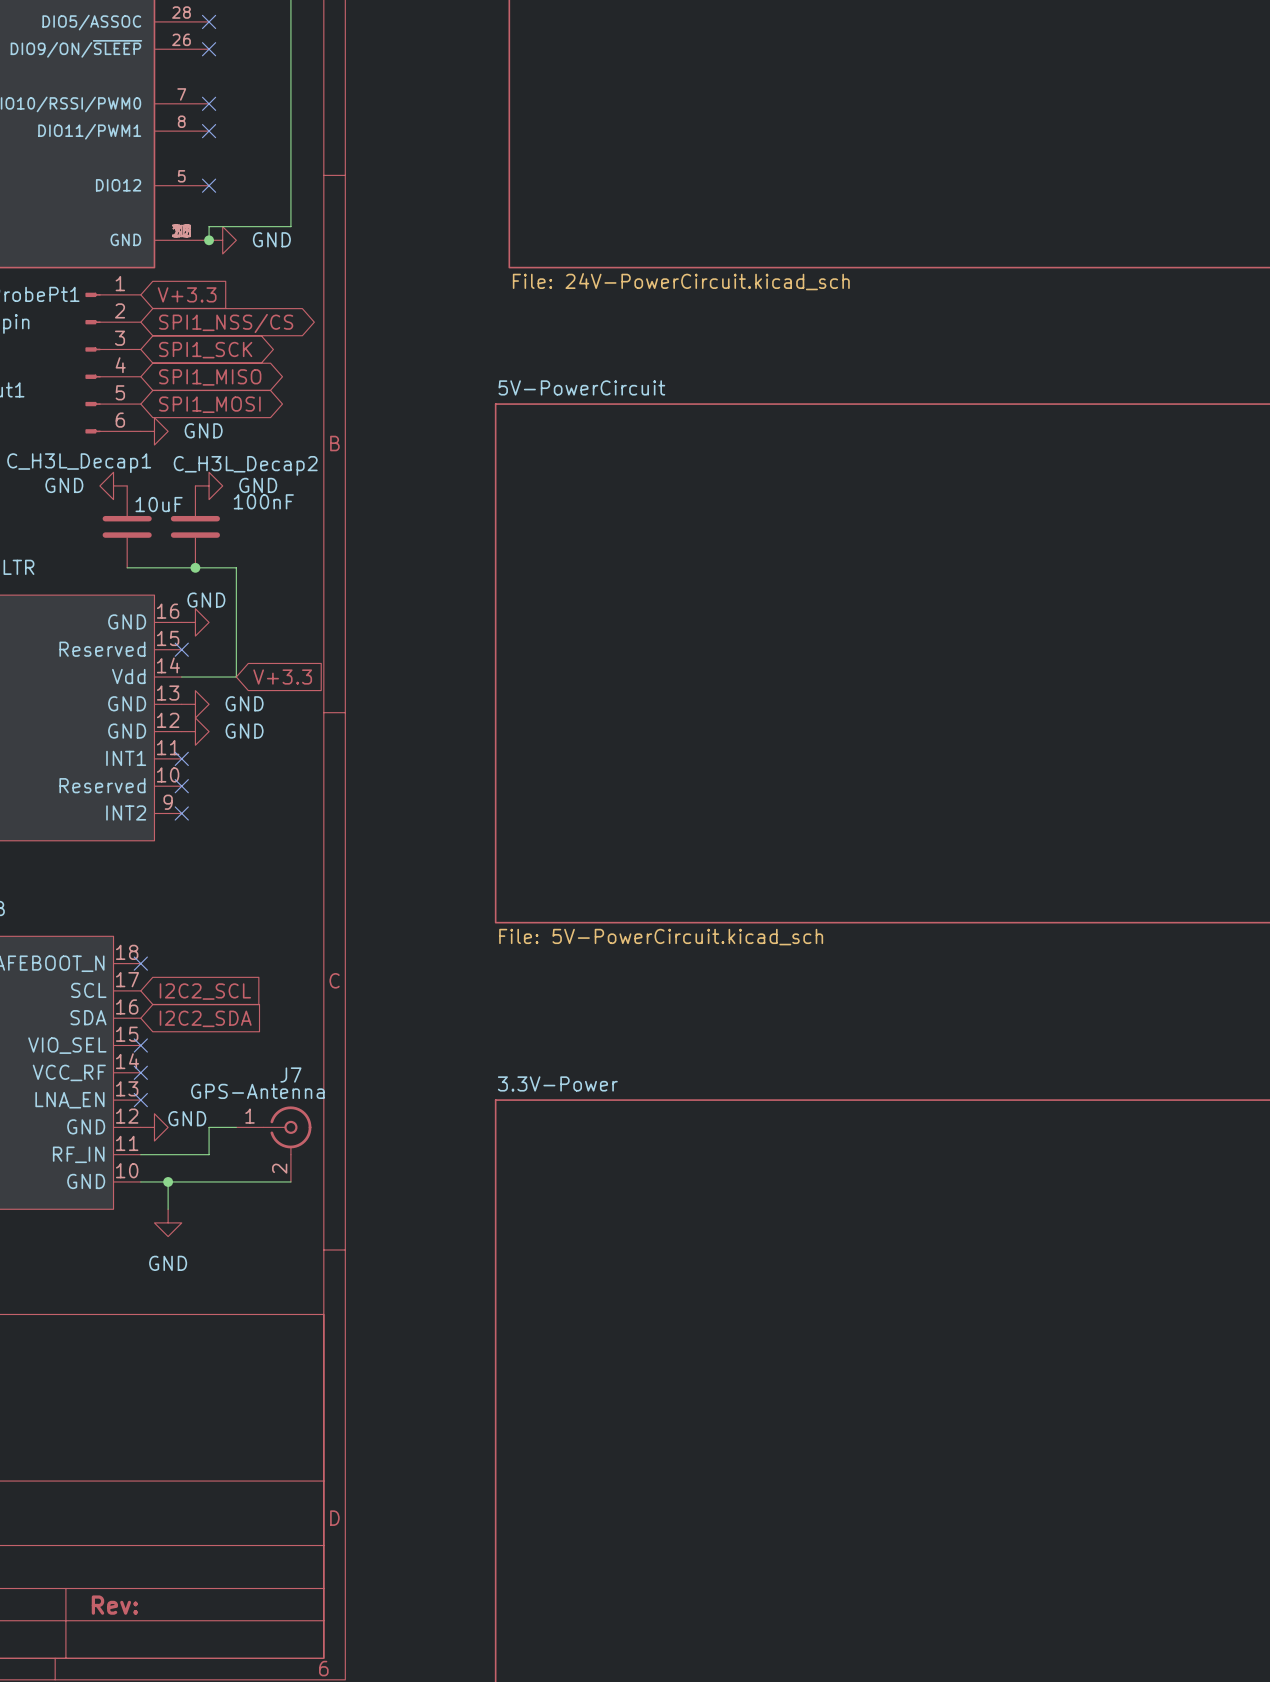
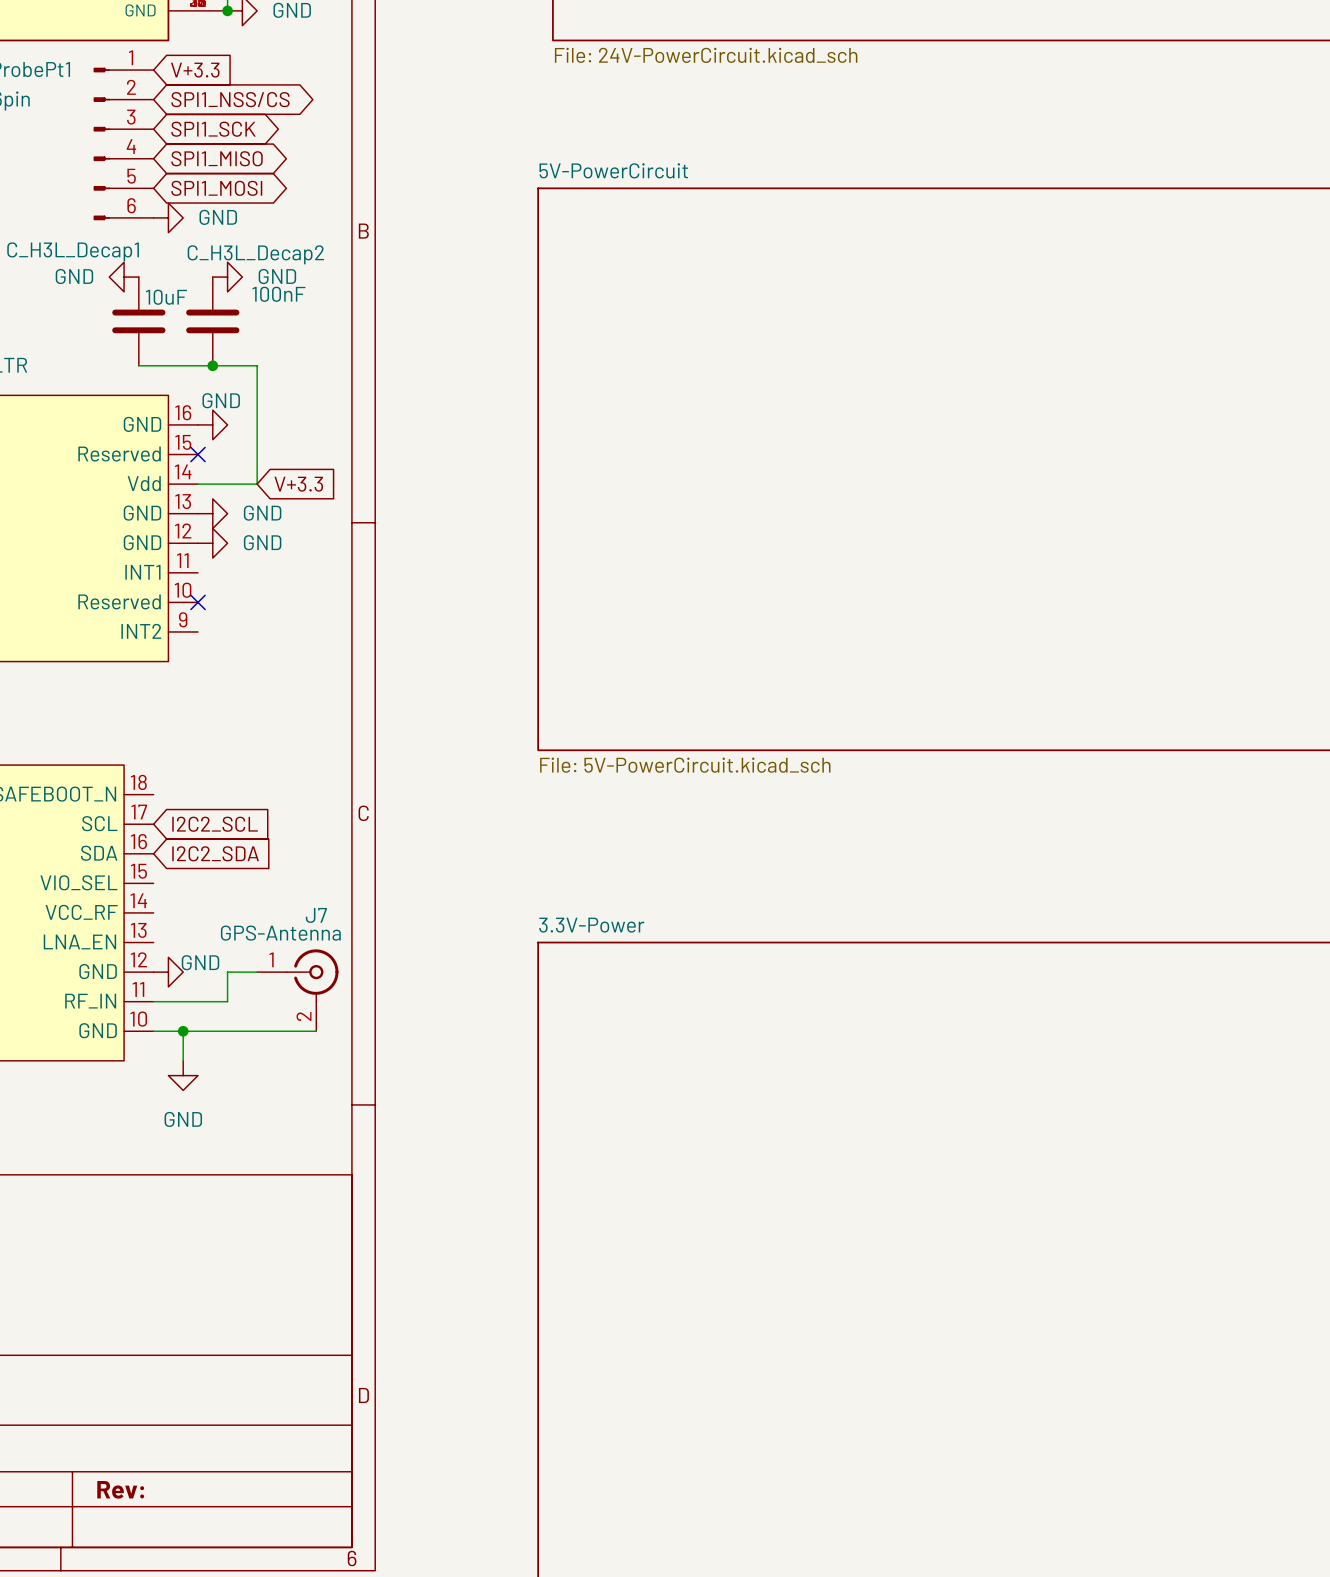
no-connect mark: (181, 758) -> none
no-connect mark: (181, 813) -> none
no-connect mark: (140, 963) -> none
no-connect mark: (140, 1045) -> none
no-connect mark: (140, 1072) -> none
no-connect mark: (140, 1100) -> none

